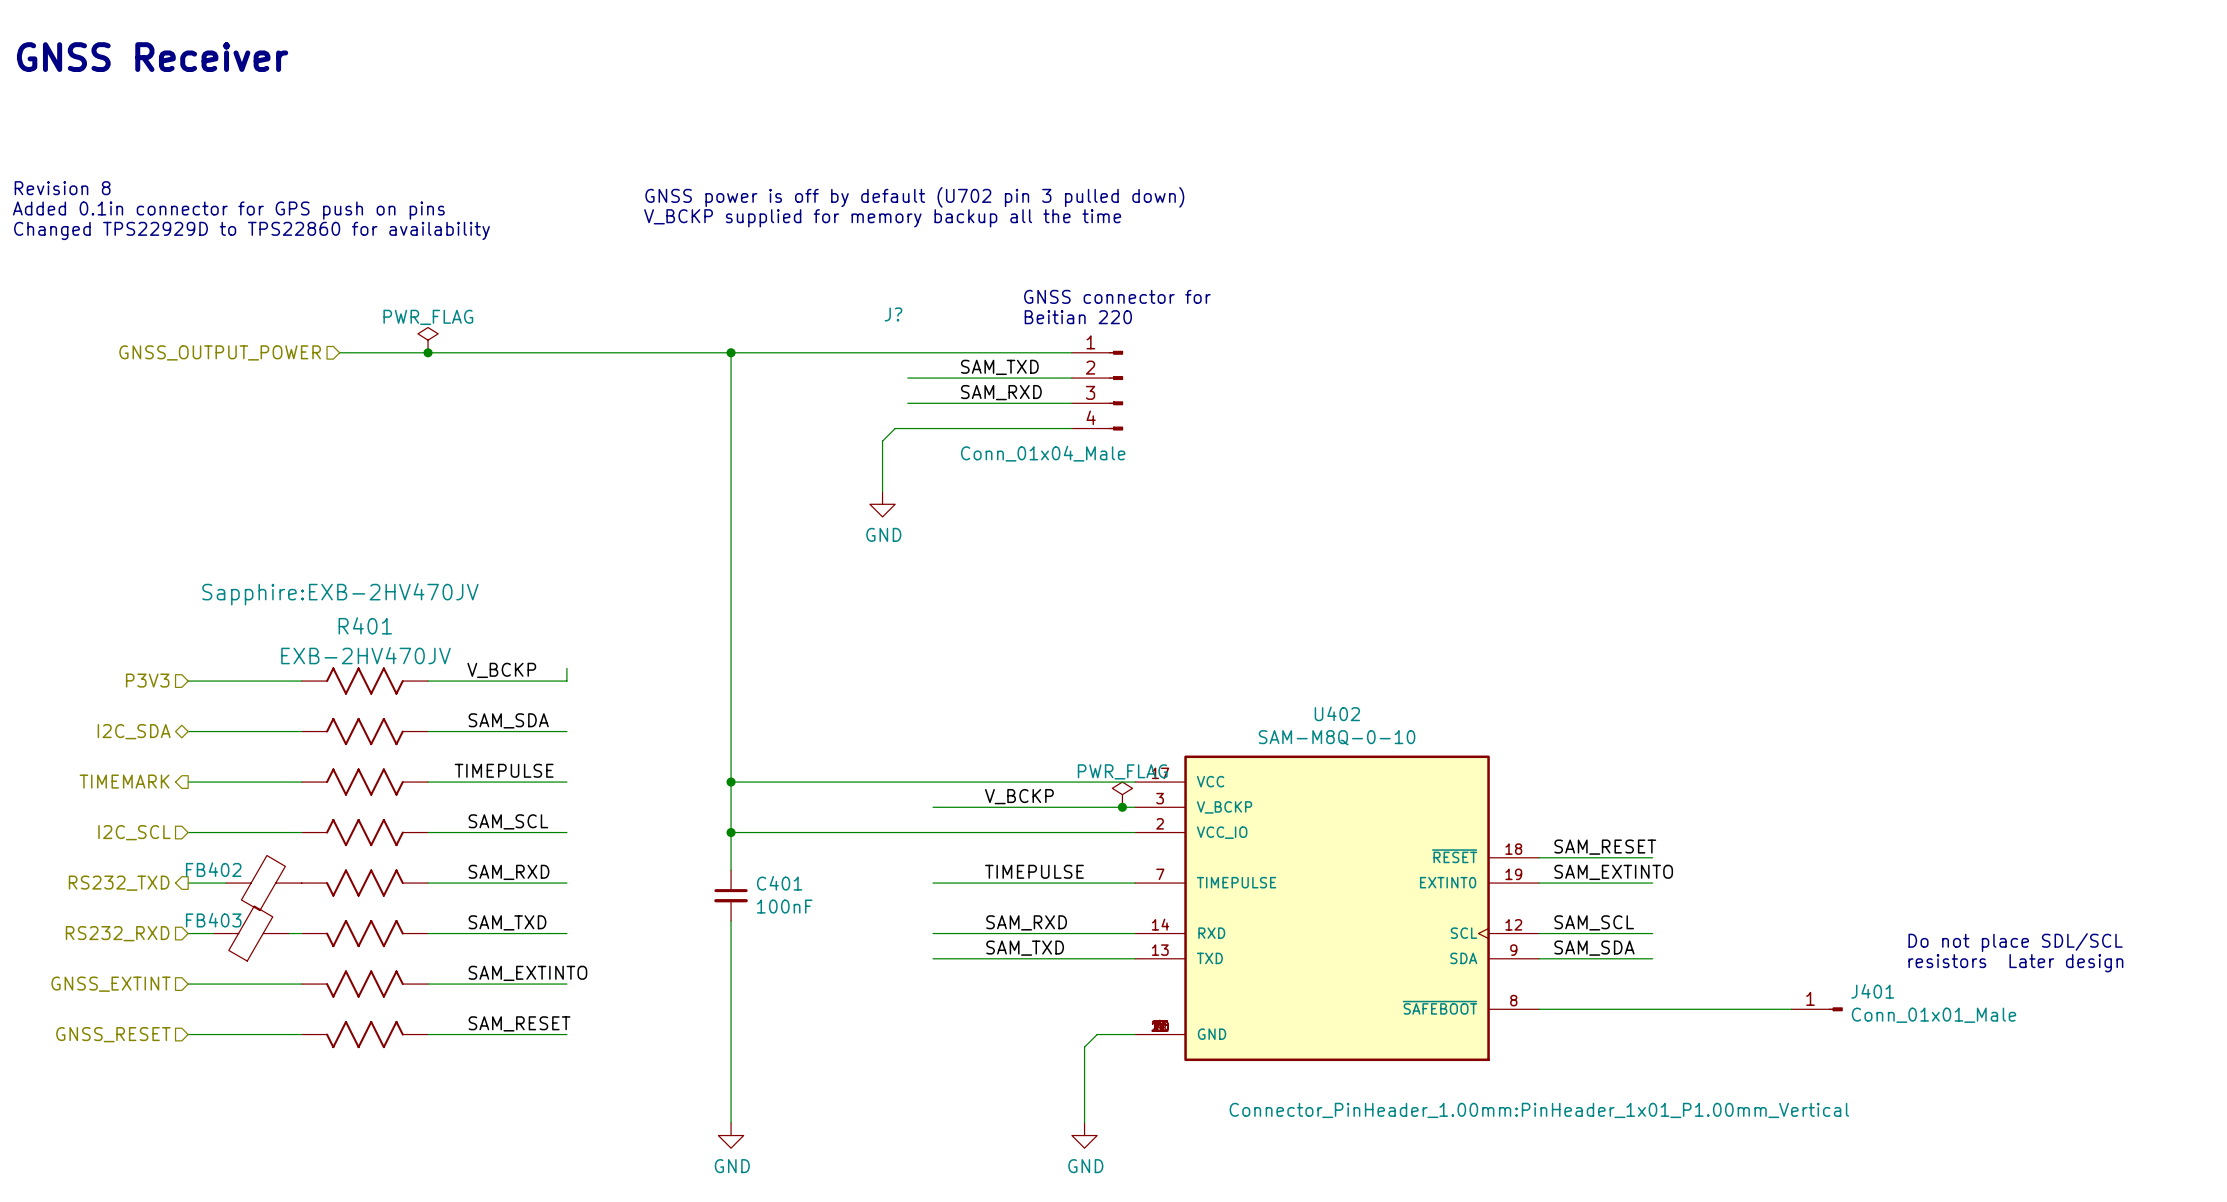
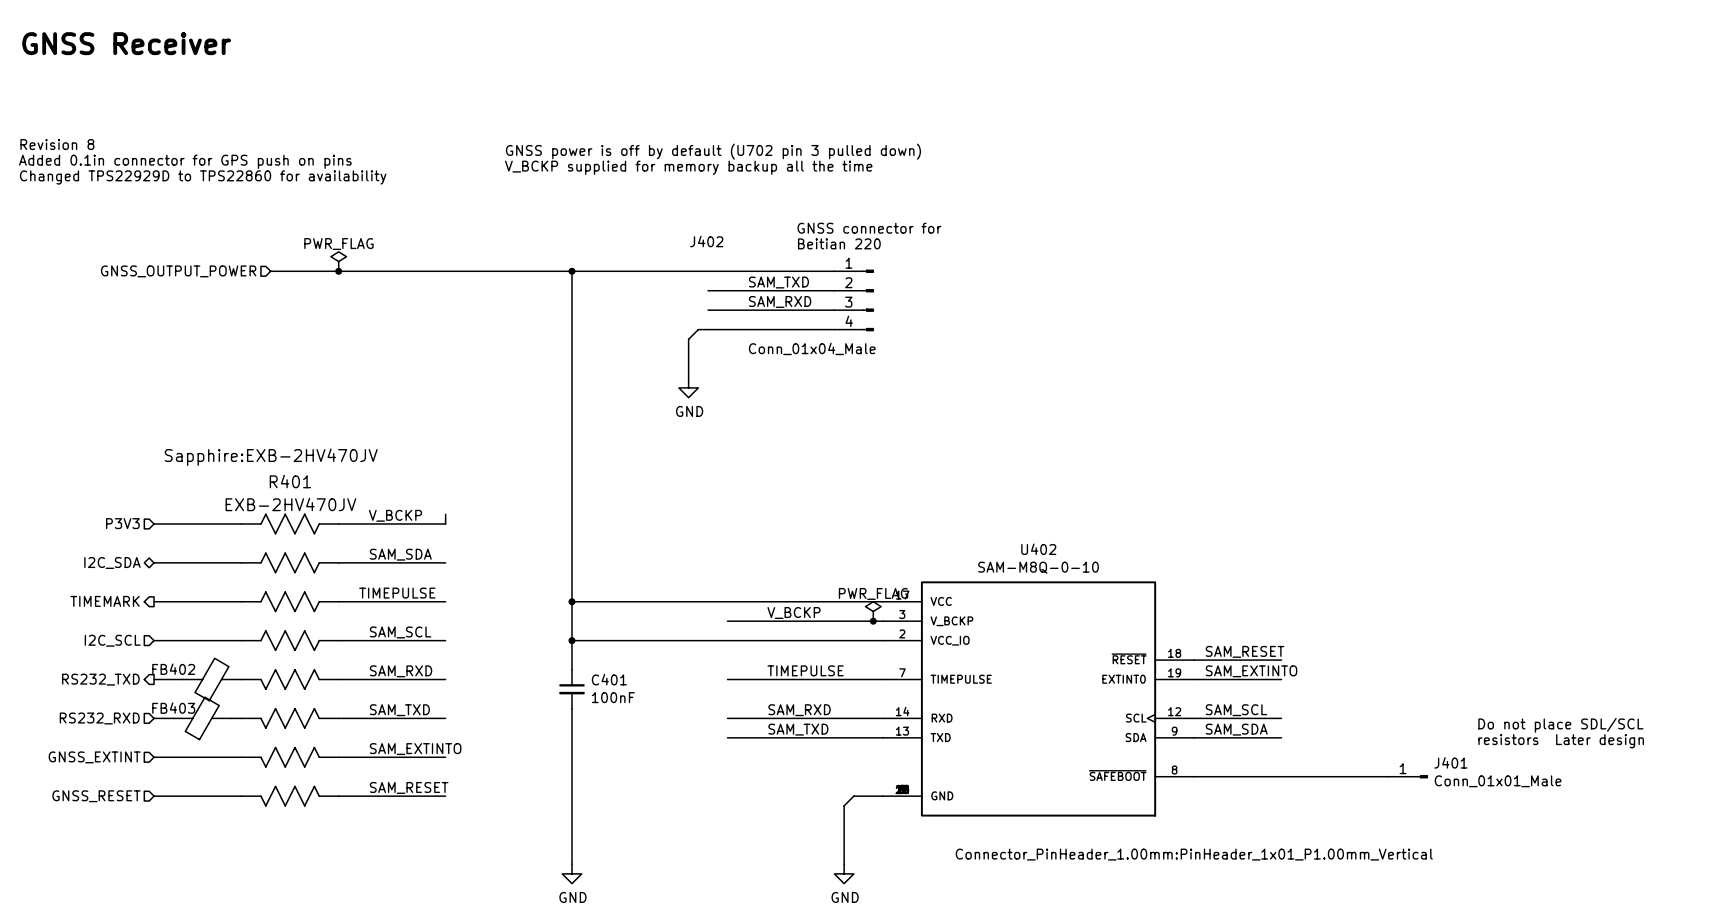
J? name: J? (893, 314) -> J402 (706, 241)

